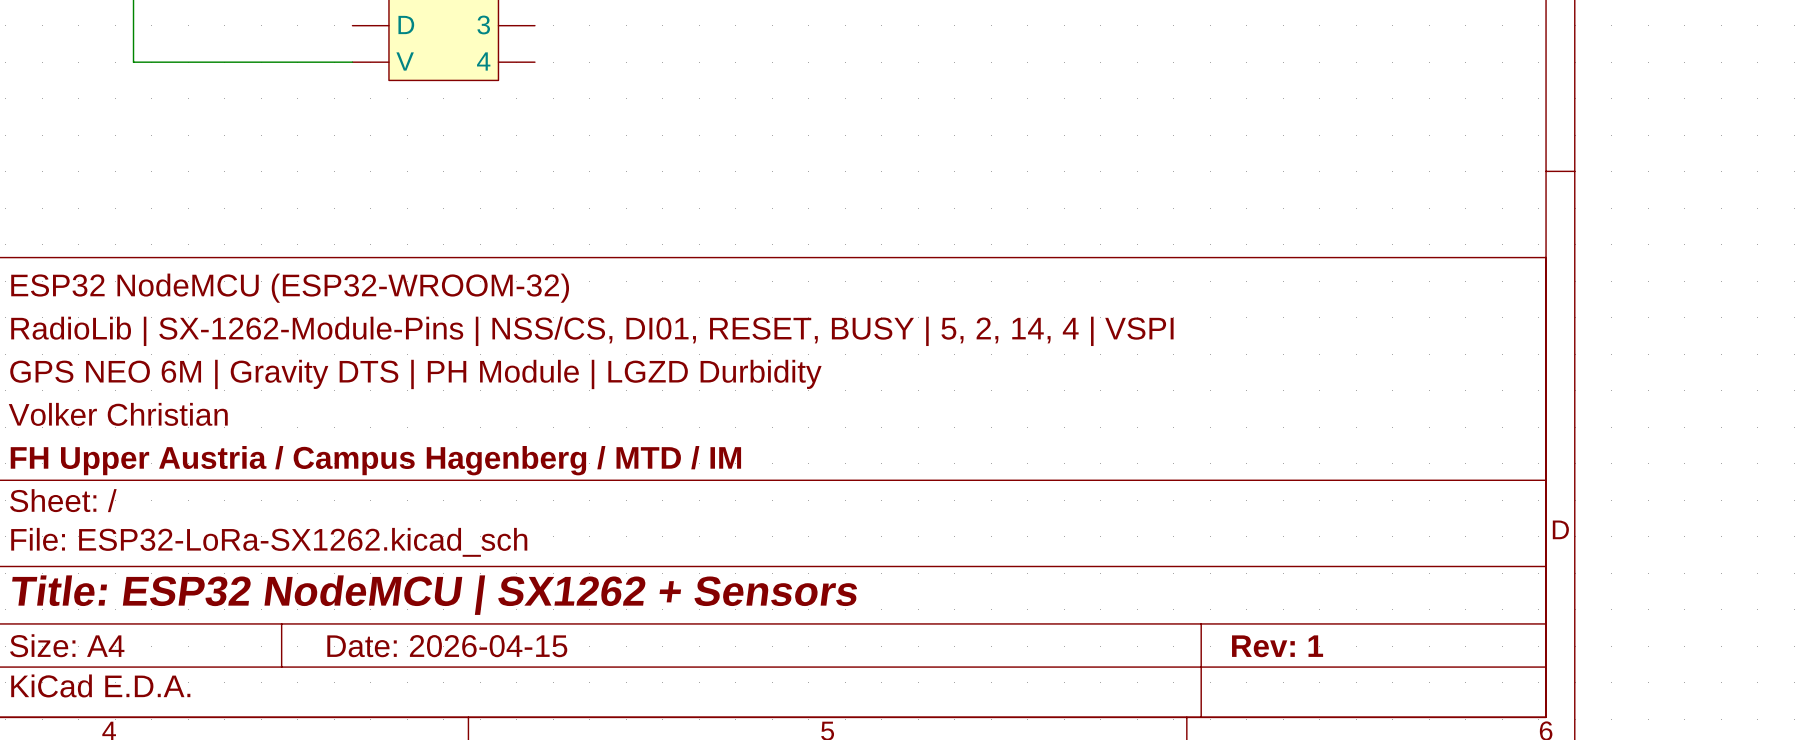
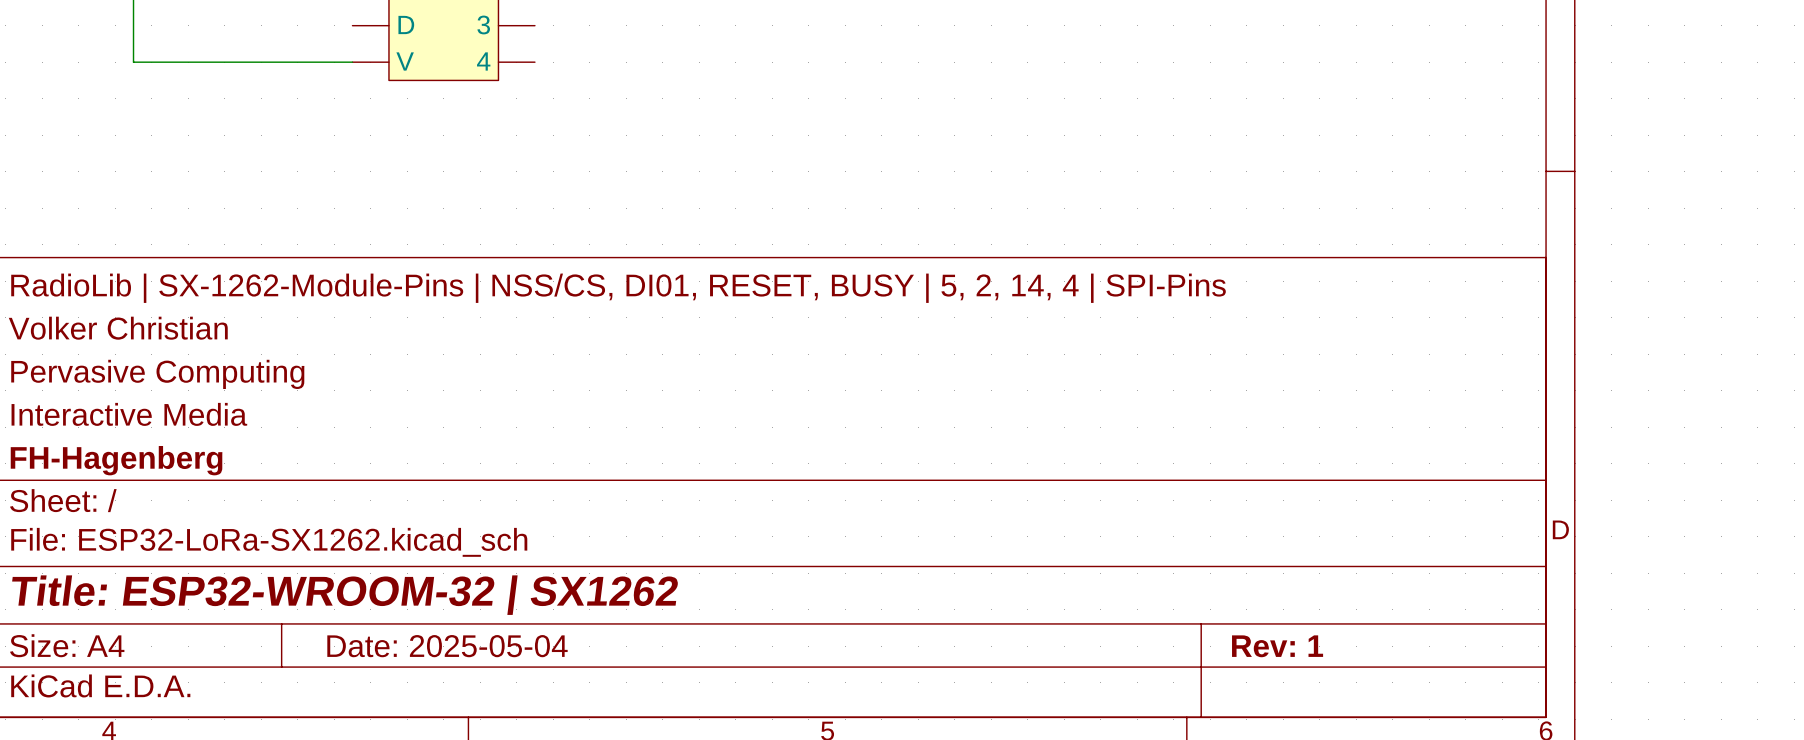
title block: ESP32 NodeMCU (ESP32-WROOM-32) (290, 288) -> RadioLib | SX-1262-Module-Pins | NSS/CS, DI01, RESET, BUSY | 5, 2, 14, 4 | SPI-Pins (618, 288)
title block: RadioLib | SX-1262-Module-Pins | NSS/CS, DI01, RESET, BUSY | 5, 2, 14, 4 | VSPI (592, 331) -> Volker Christian (118, 328)
title block: GPS NEO 6M | Gravity DTS | PH Module | LGZD Durbidity (415, 374) -> Pervasive Computing (157, 374)
title block: Volker Christian (118, 414) -> Interactive Media (129, 414)
title block: FH Upper Austria / Campus Hagenberg / MTD / IM (375, 460) -> FH-Hagenberg (116, 460)
title block: Title: ESP32 NodeMCU | SX1262 + Sensors (434, 595) -> Title: ESP32-WROOM-32 | SX1262 (345, 595)
title block: Date: 2026-04-15 (447, 646) -> Date: 2025-05-04 (447, 646)

